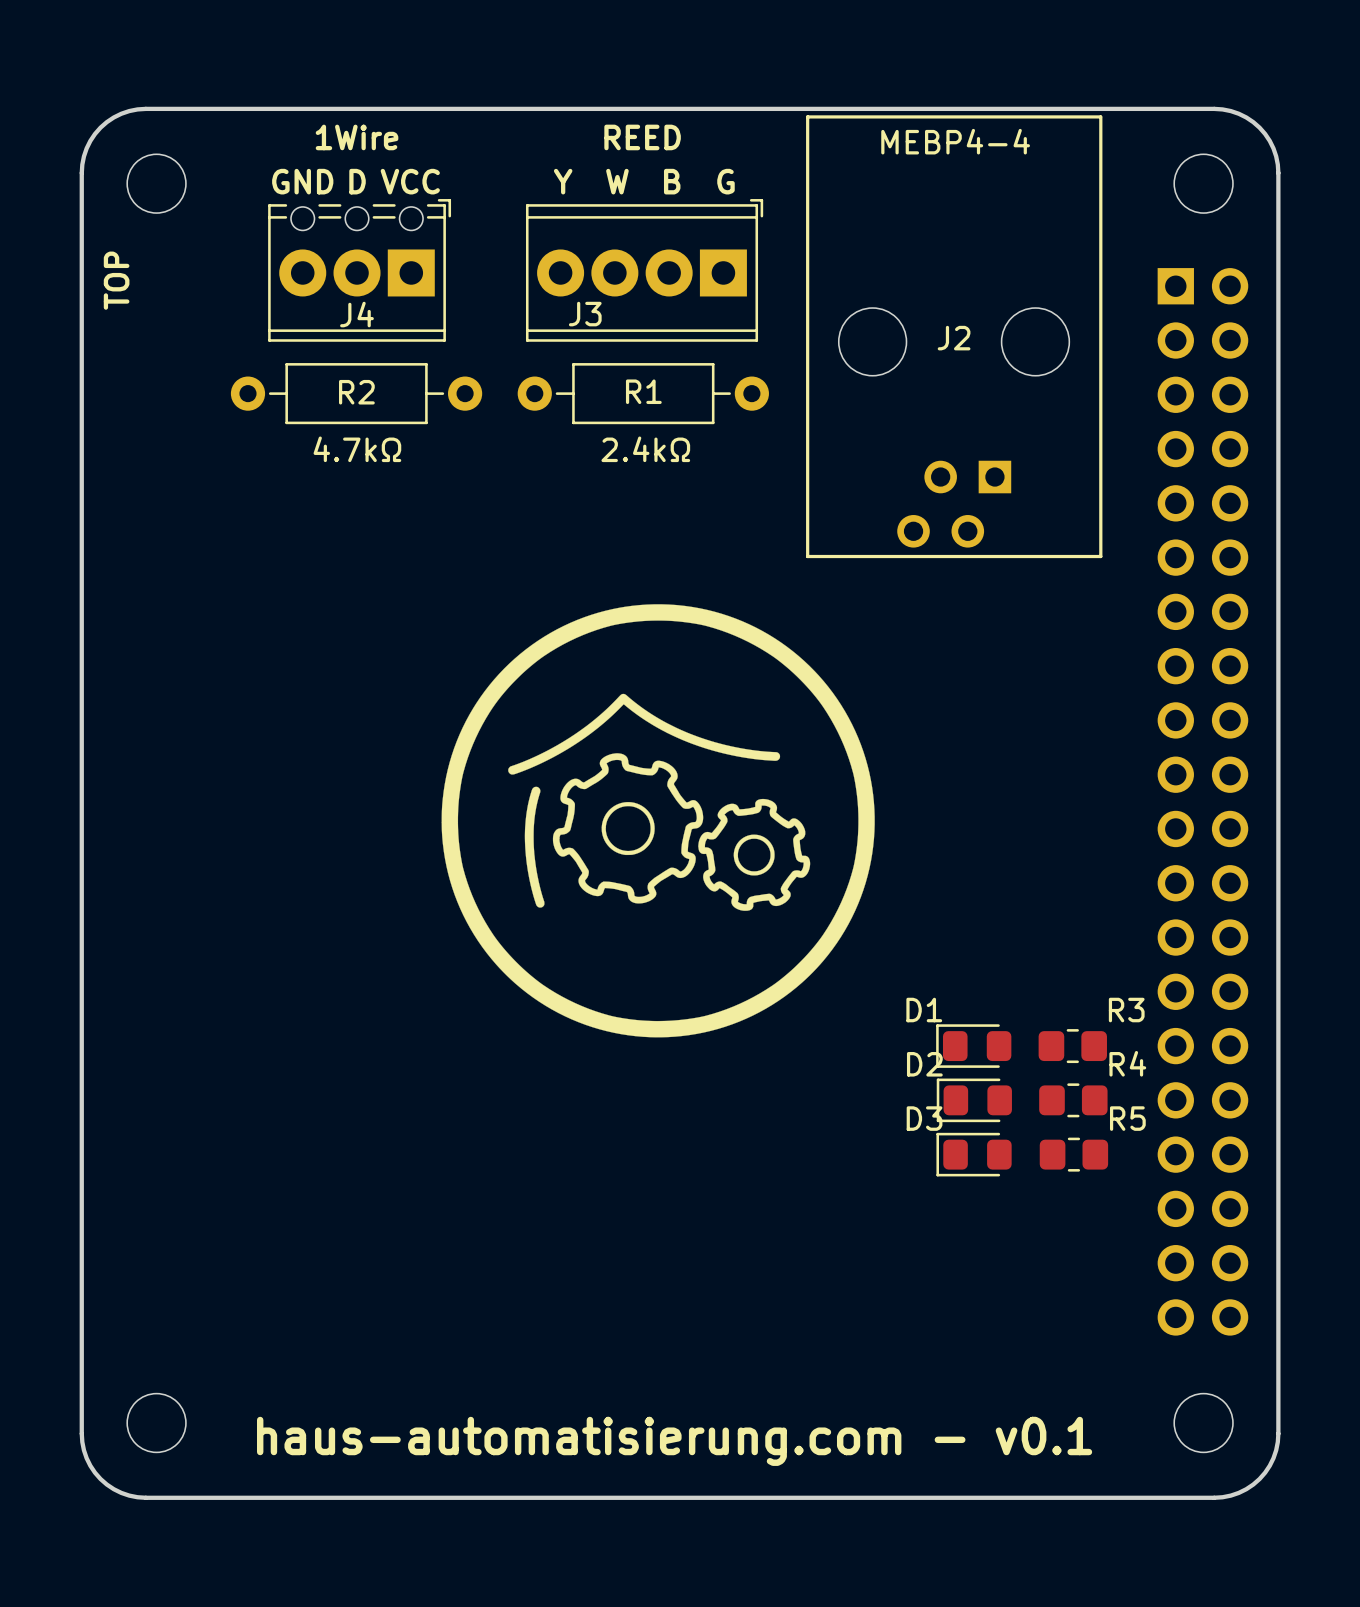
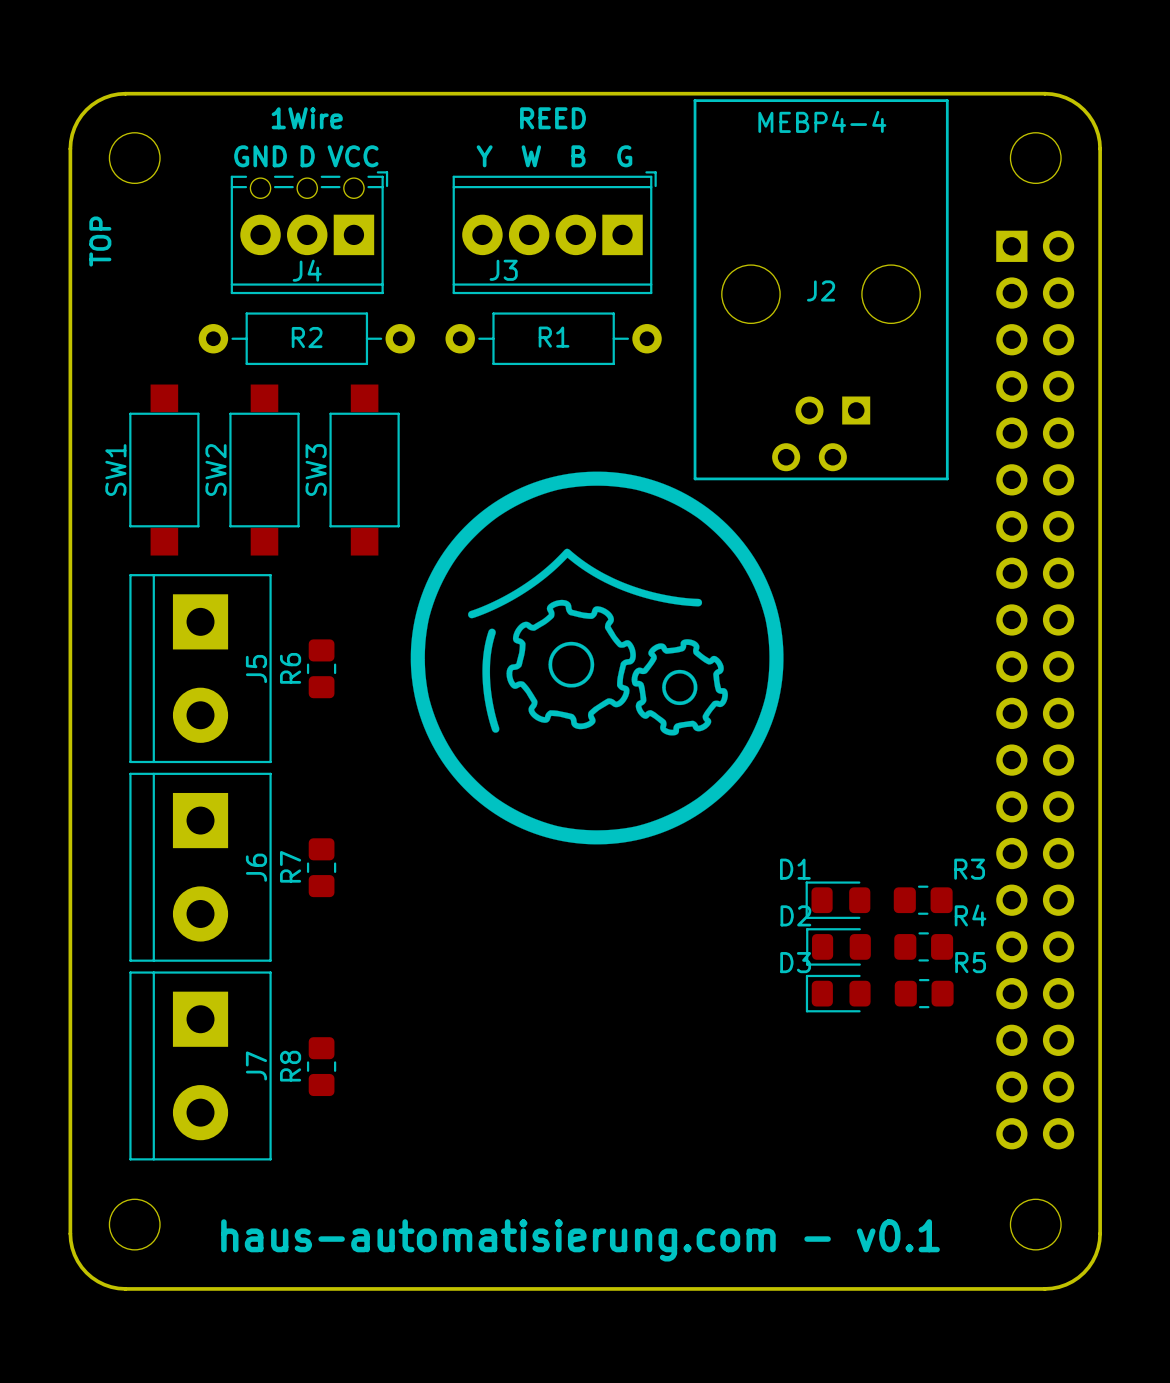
text: 4.7kΩ (357, 449) -> none
text: 2.4kΩ (645, 449) -> none
SW1: none -> (164, 470)
SW2: none -> (264, 470)
SW3: none -> (364, 470)
J5: none -> (200, 668)
R6: none -> (321, 668)
drawing position: (658, 820) -> (597, 658)
J6: none -> (200, 867)
R7: none -> (321, 867)
J7: none -> (200, 1065)
R8: none -> (321, 1066)

